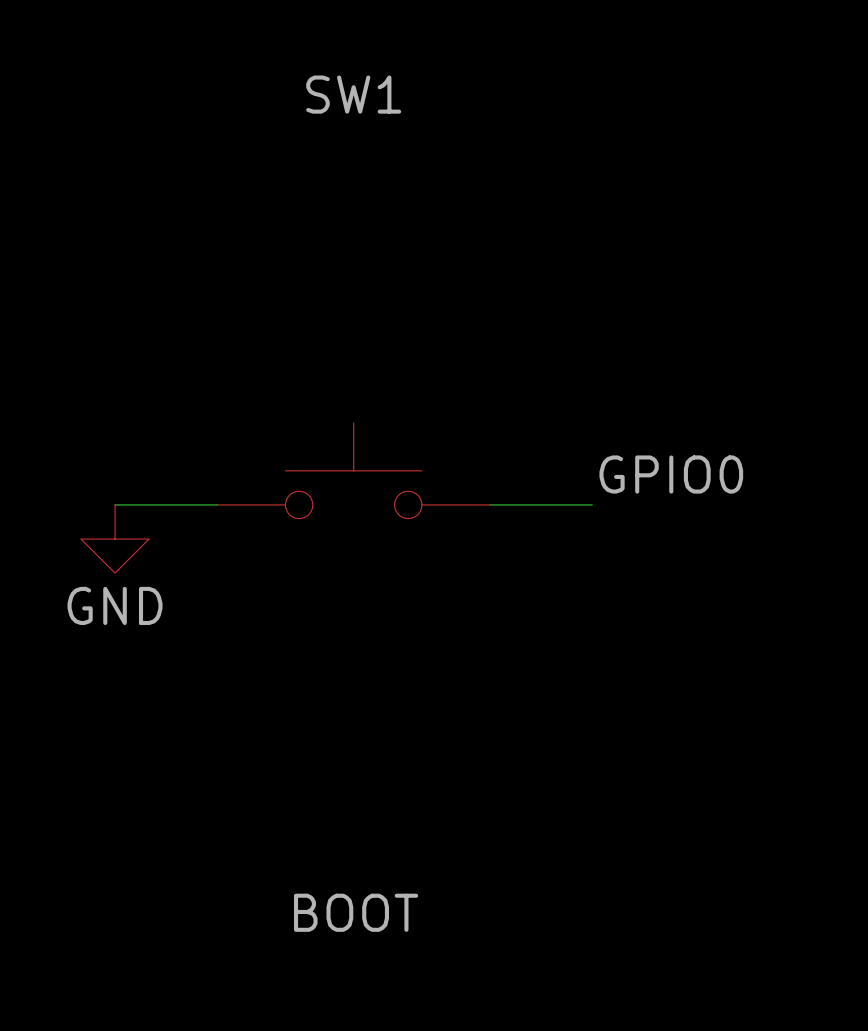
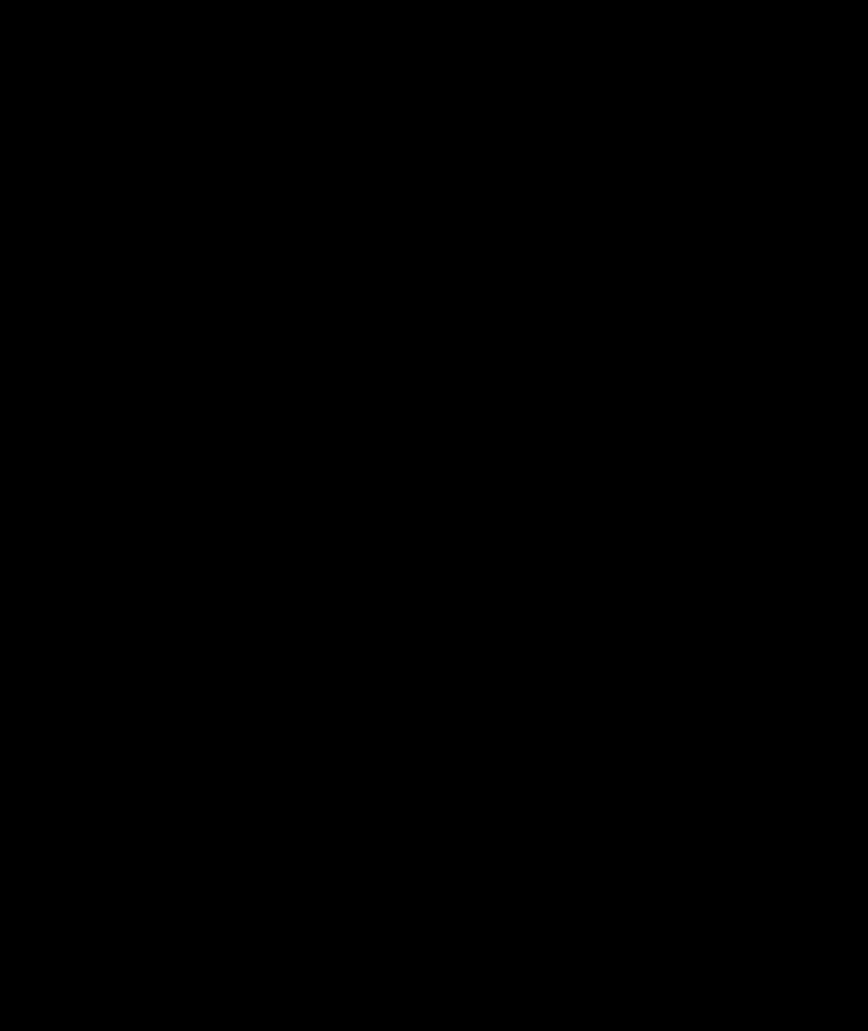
SW1: BOOT (353, 470) -> none
label: GPIO0 (671, 474) -> none
wire: (115, 504) (217, 504) -> none
wire: (490, 504) (592, 504) -> none
power symbol: GND (115, 539) -> none

